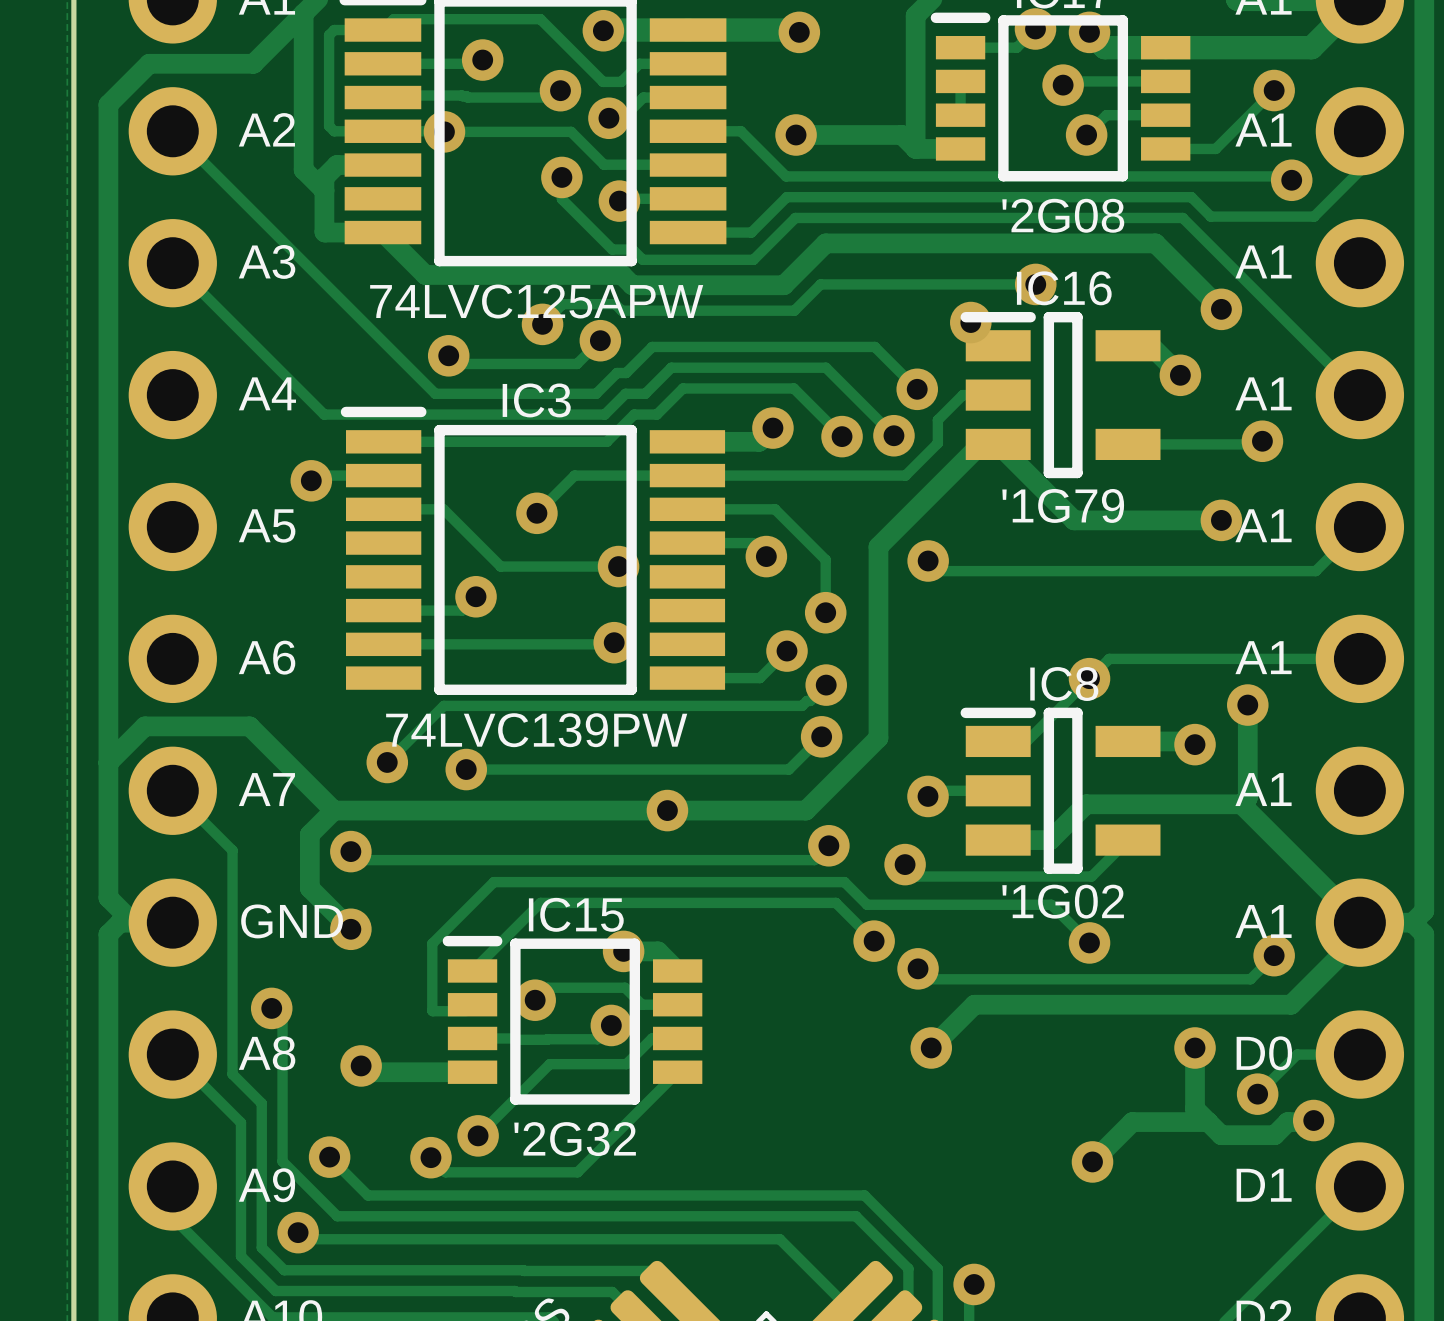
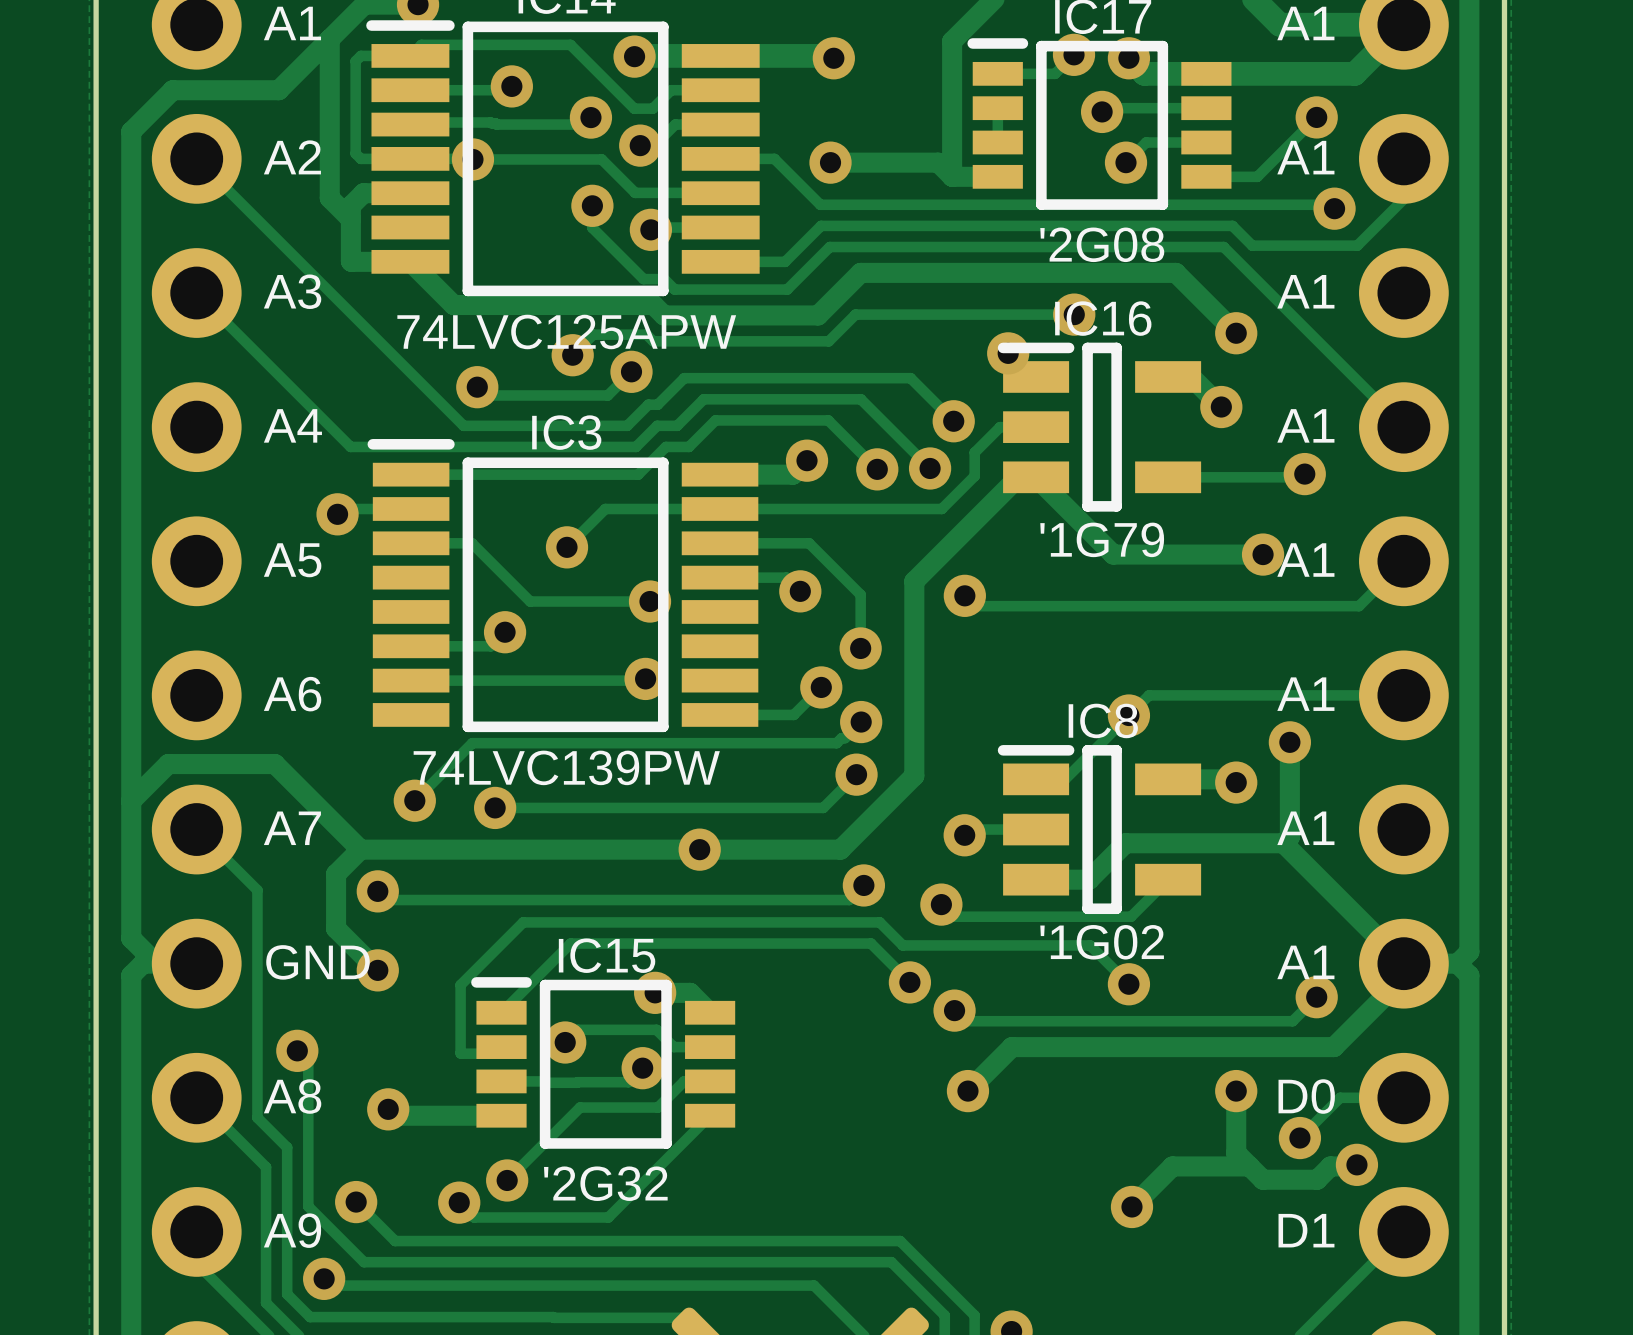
track: (1135, 243) (1155, 243) (1221, 309) -> (1175, 272) (1236, 333)
via position: (1221, 309) -> (1236, 333)

